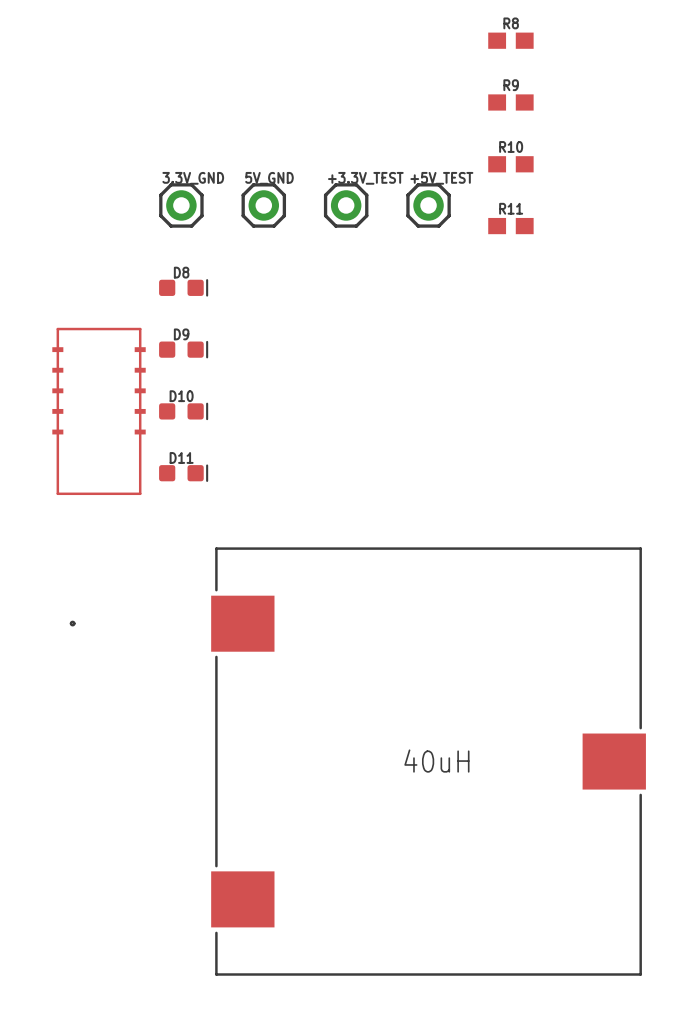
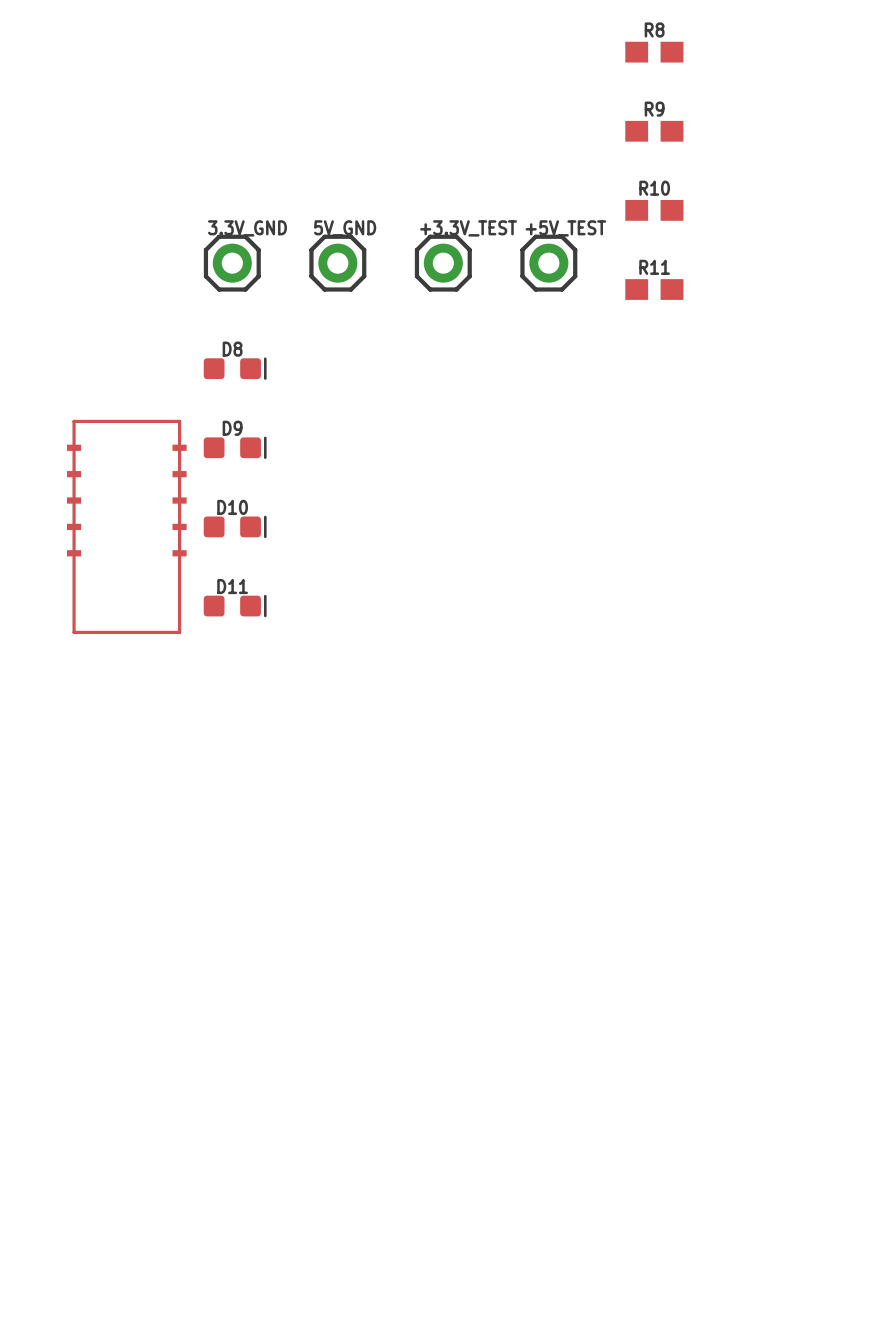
part: 40uH (357, 761) -> none

